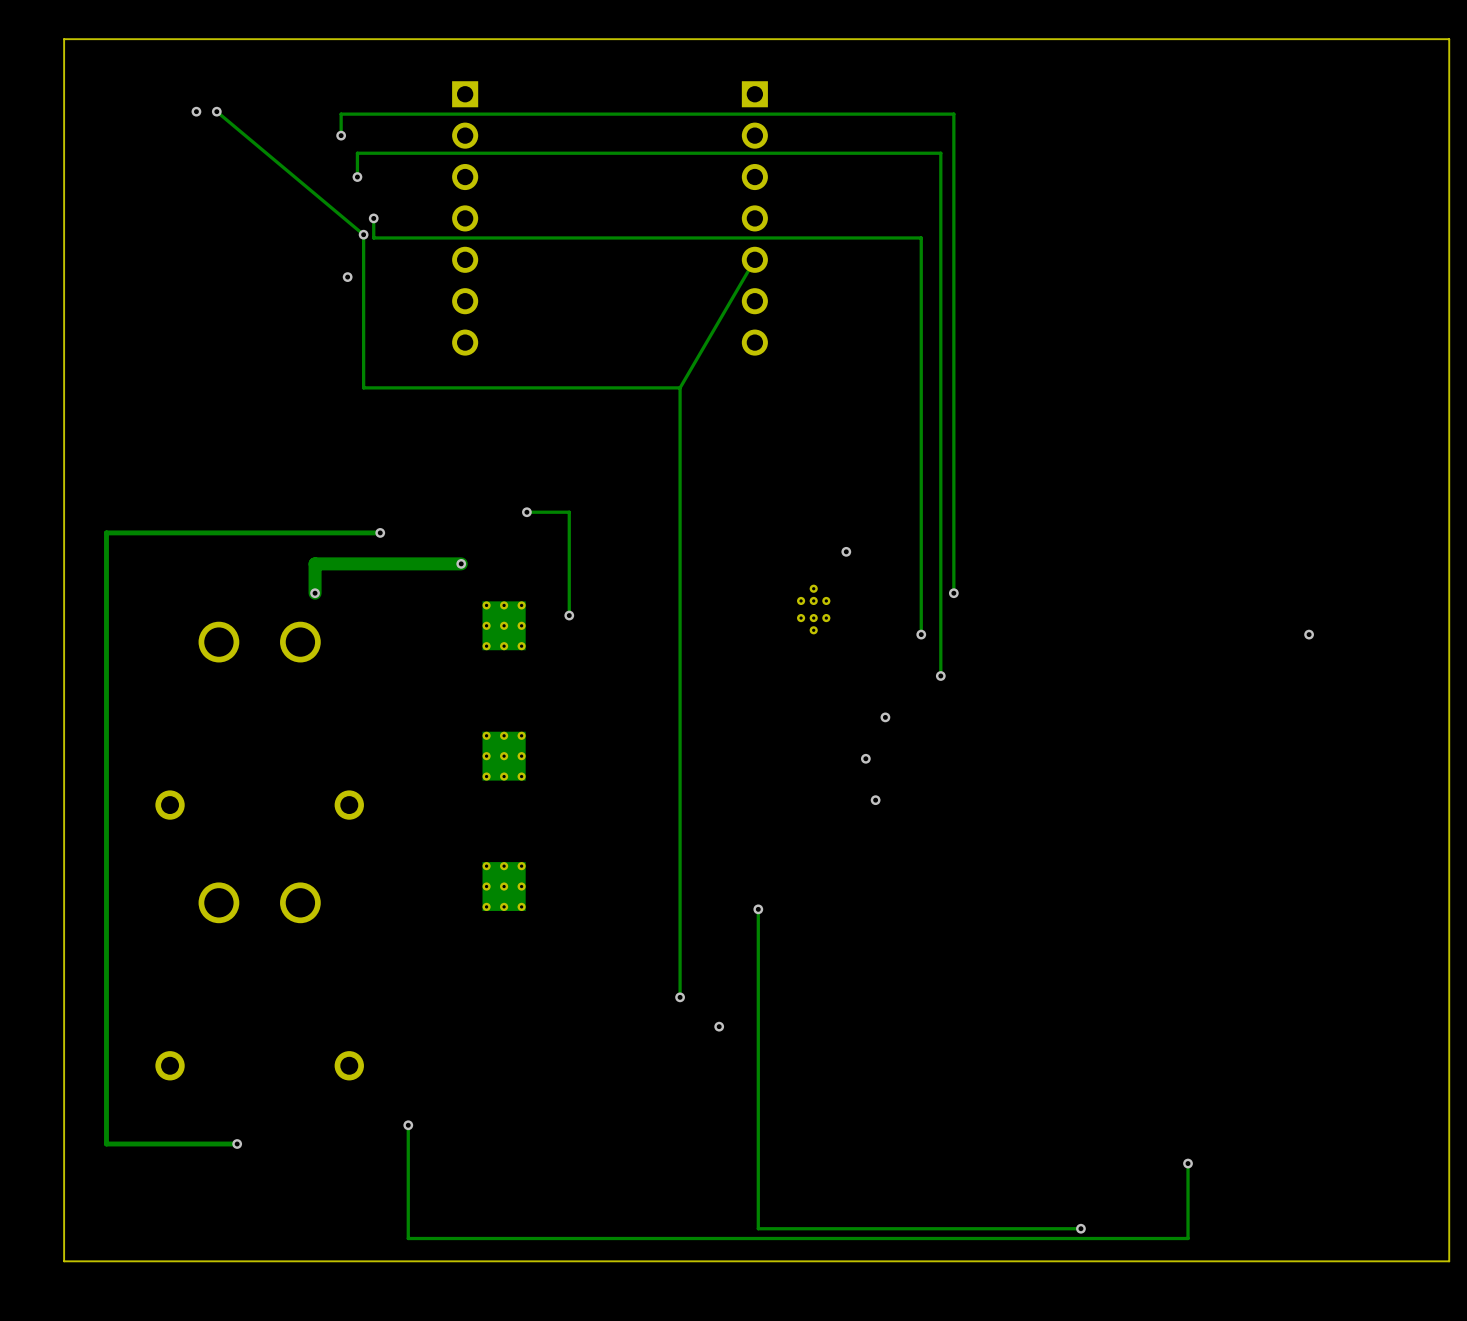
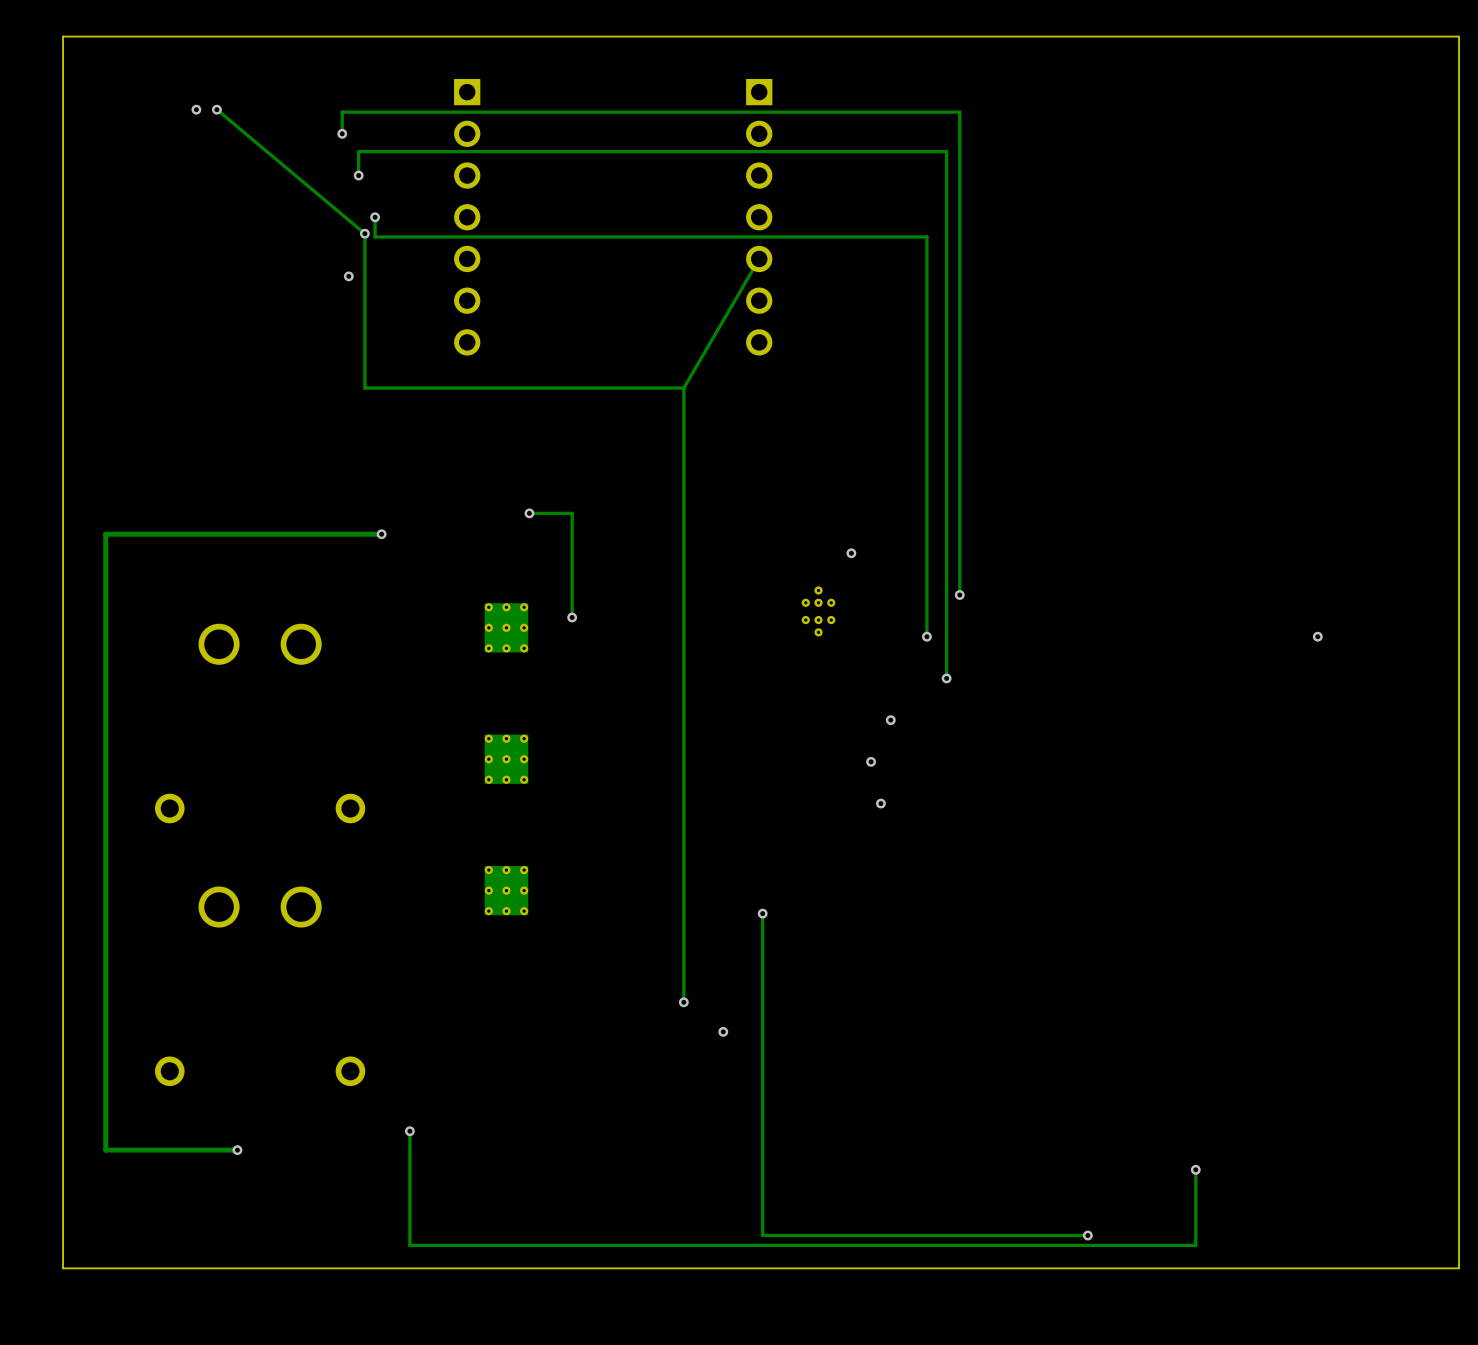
track: (461, 563) (315, 563) (315, 593) -> none
via: (461, 563) -> none
via: (315, 593) -> none

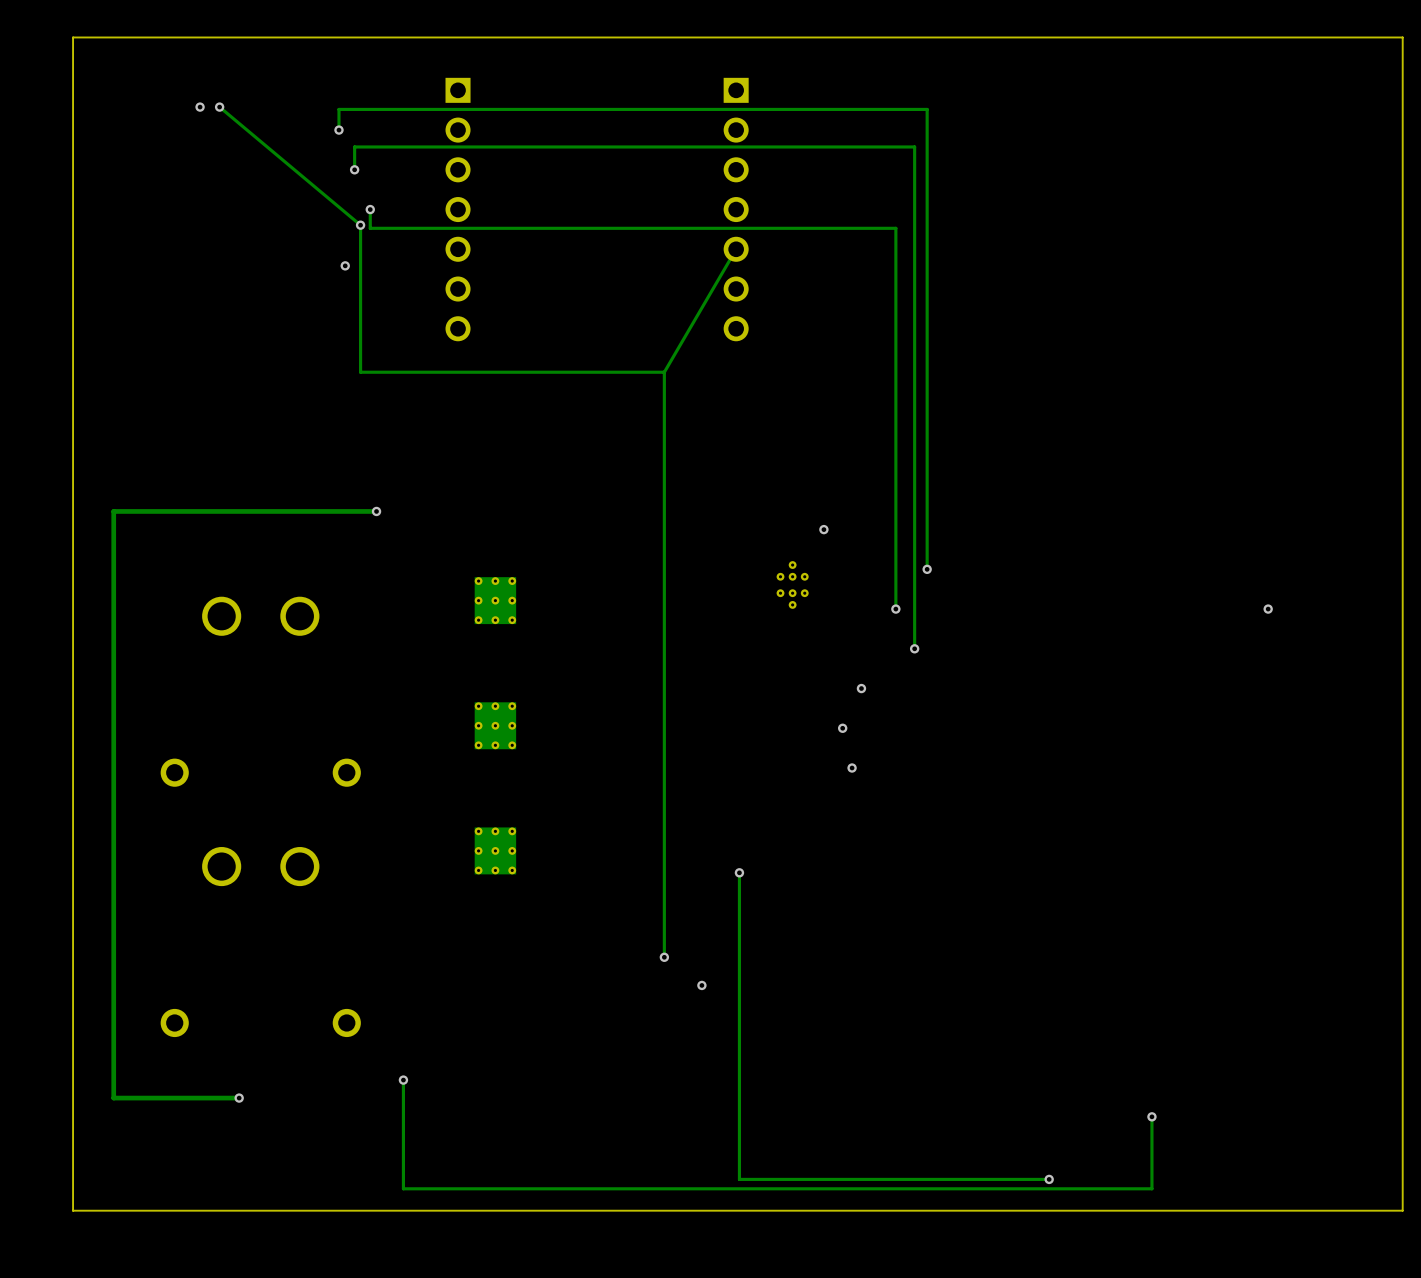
track: (529, 513) (572, 513) (572, 617) -> none
via: (529, 513) -> none
via: (572, 617) -> none

